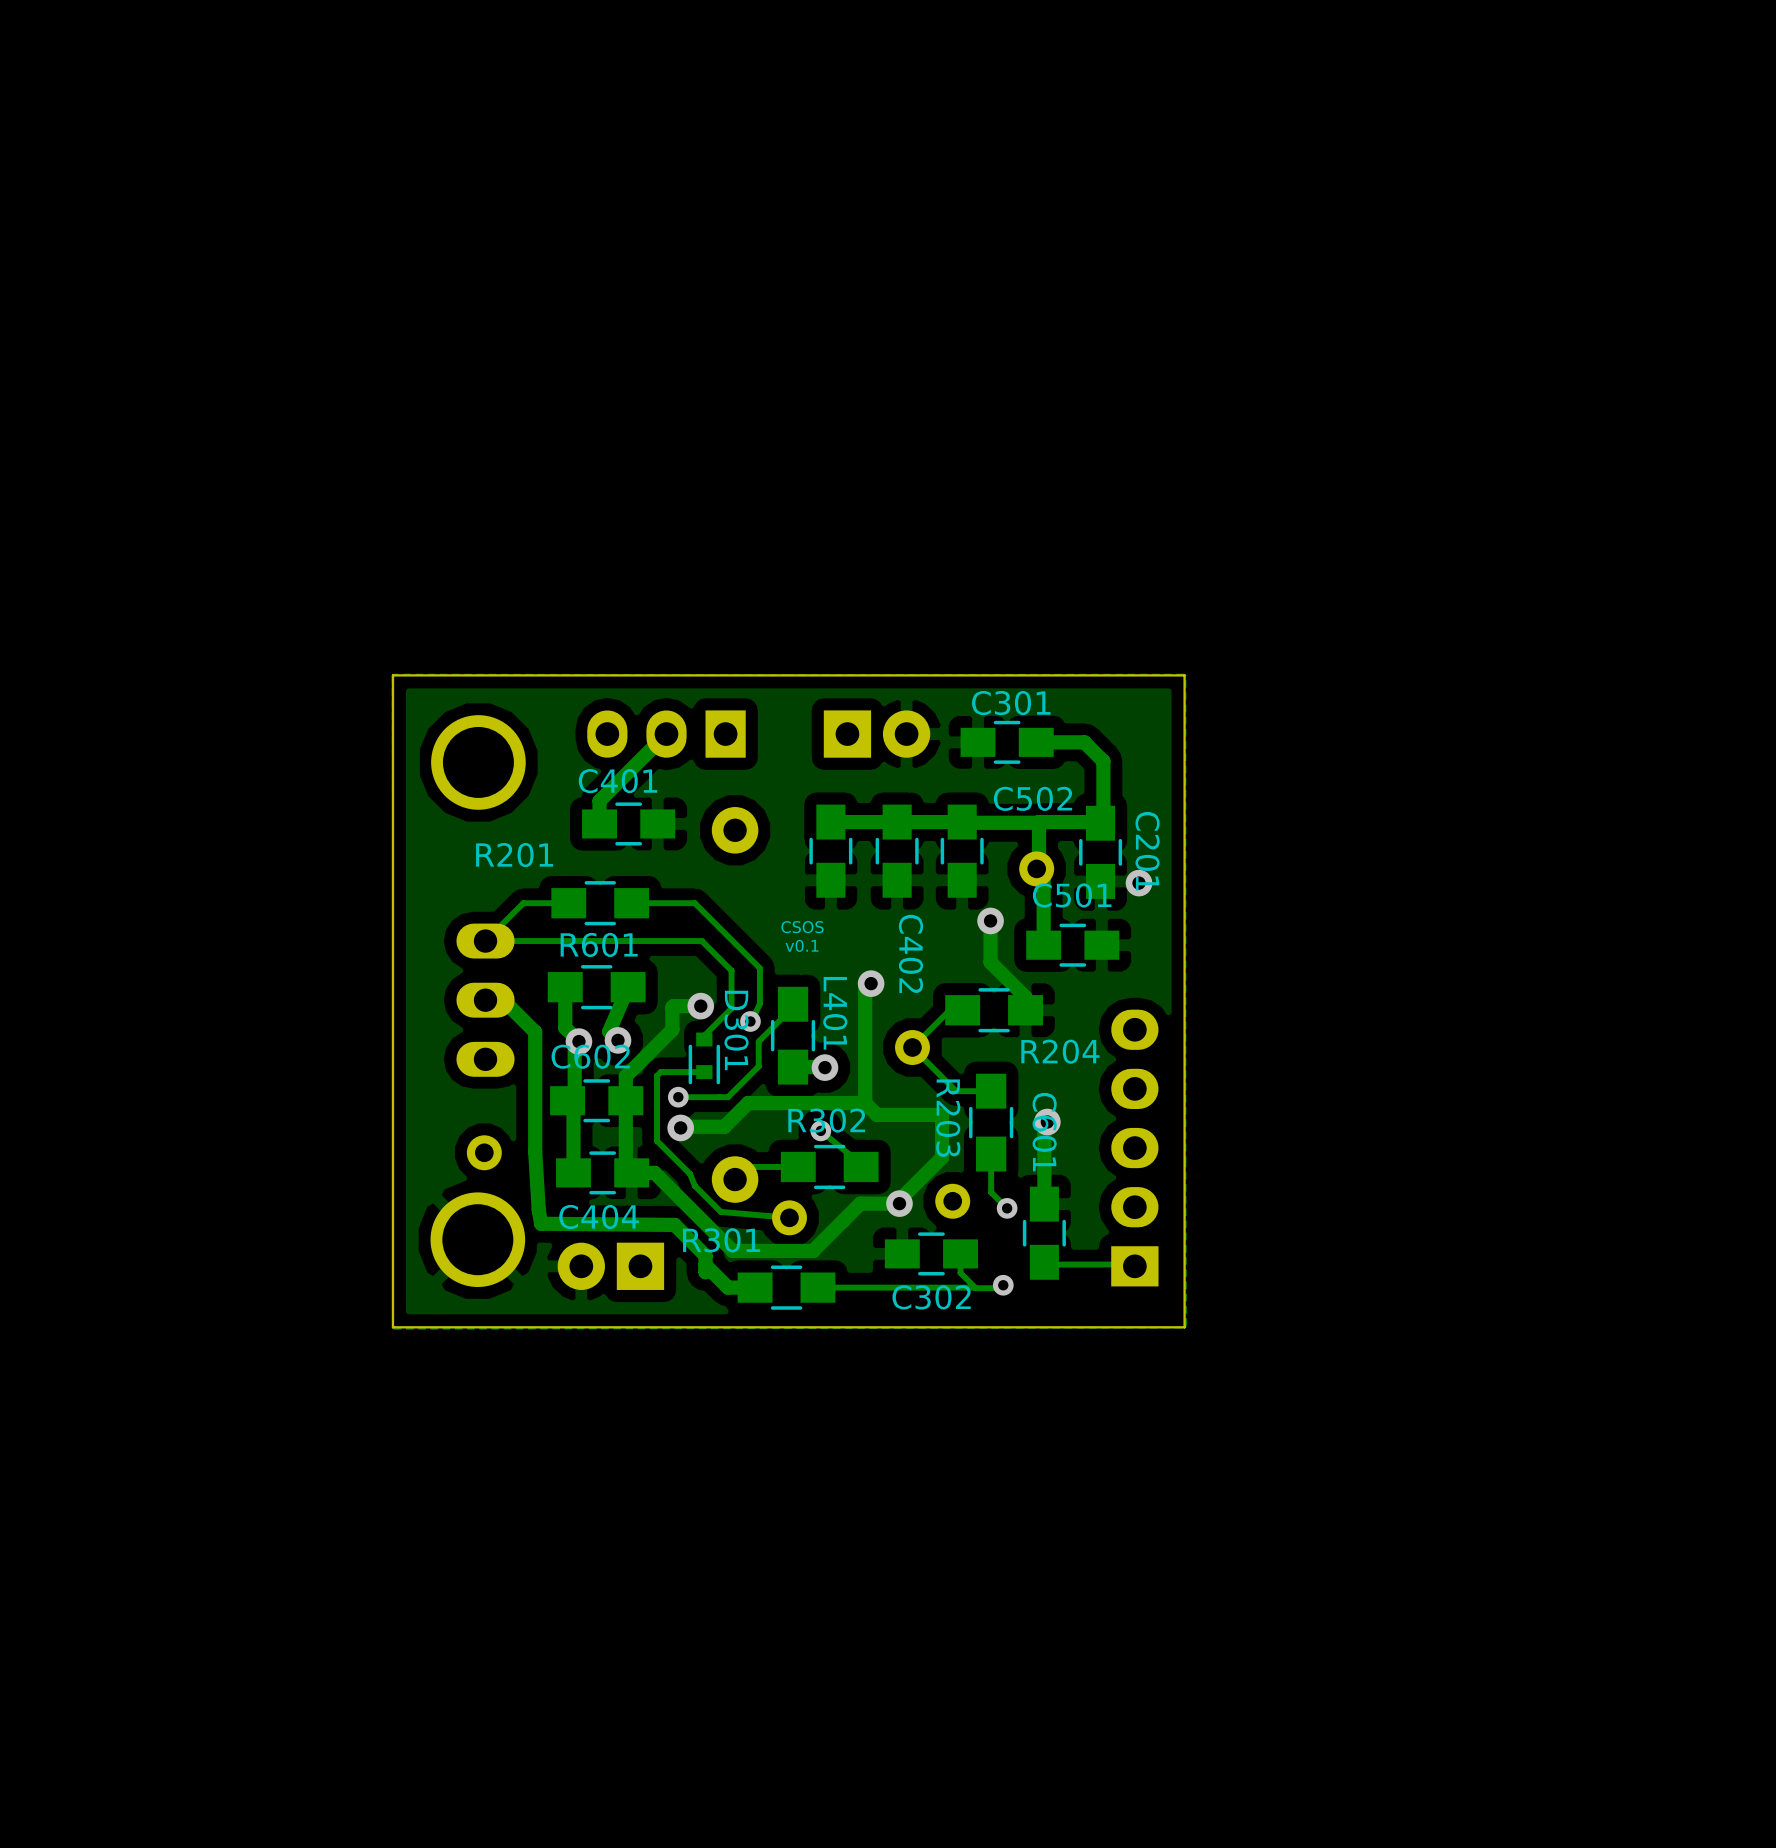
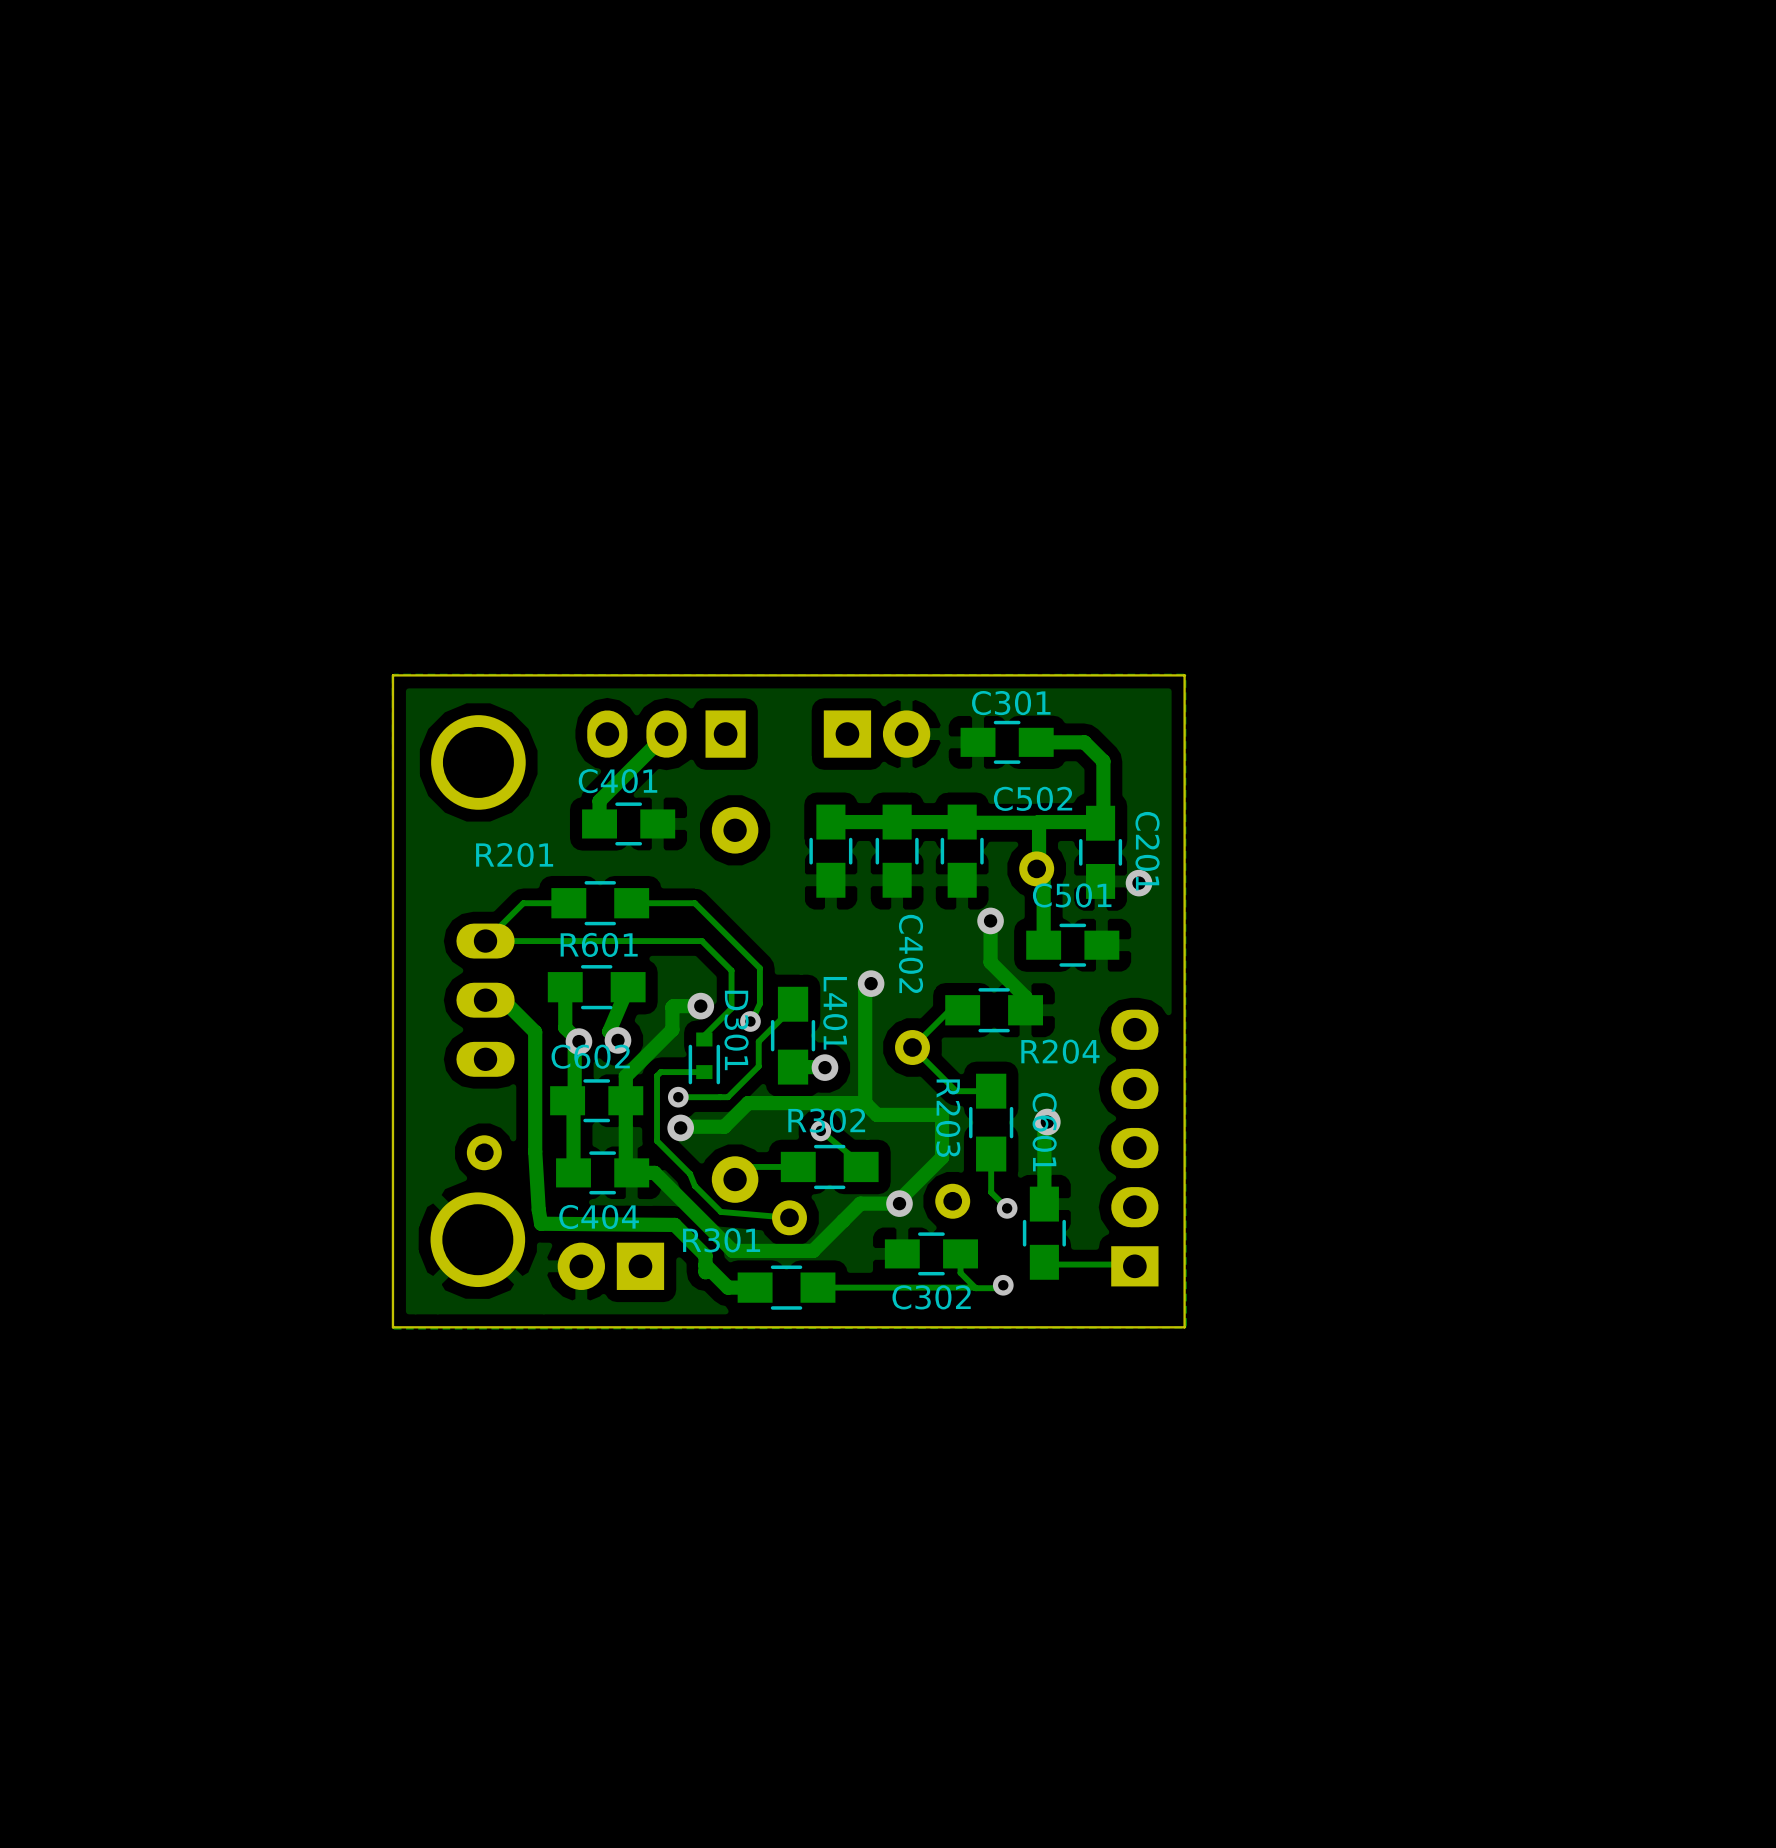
text: CSOS (802, 927) -> none
text: v0.1 (802, 945) -> none

